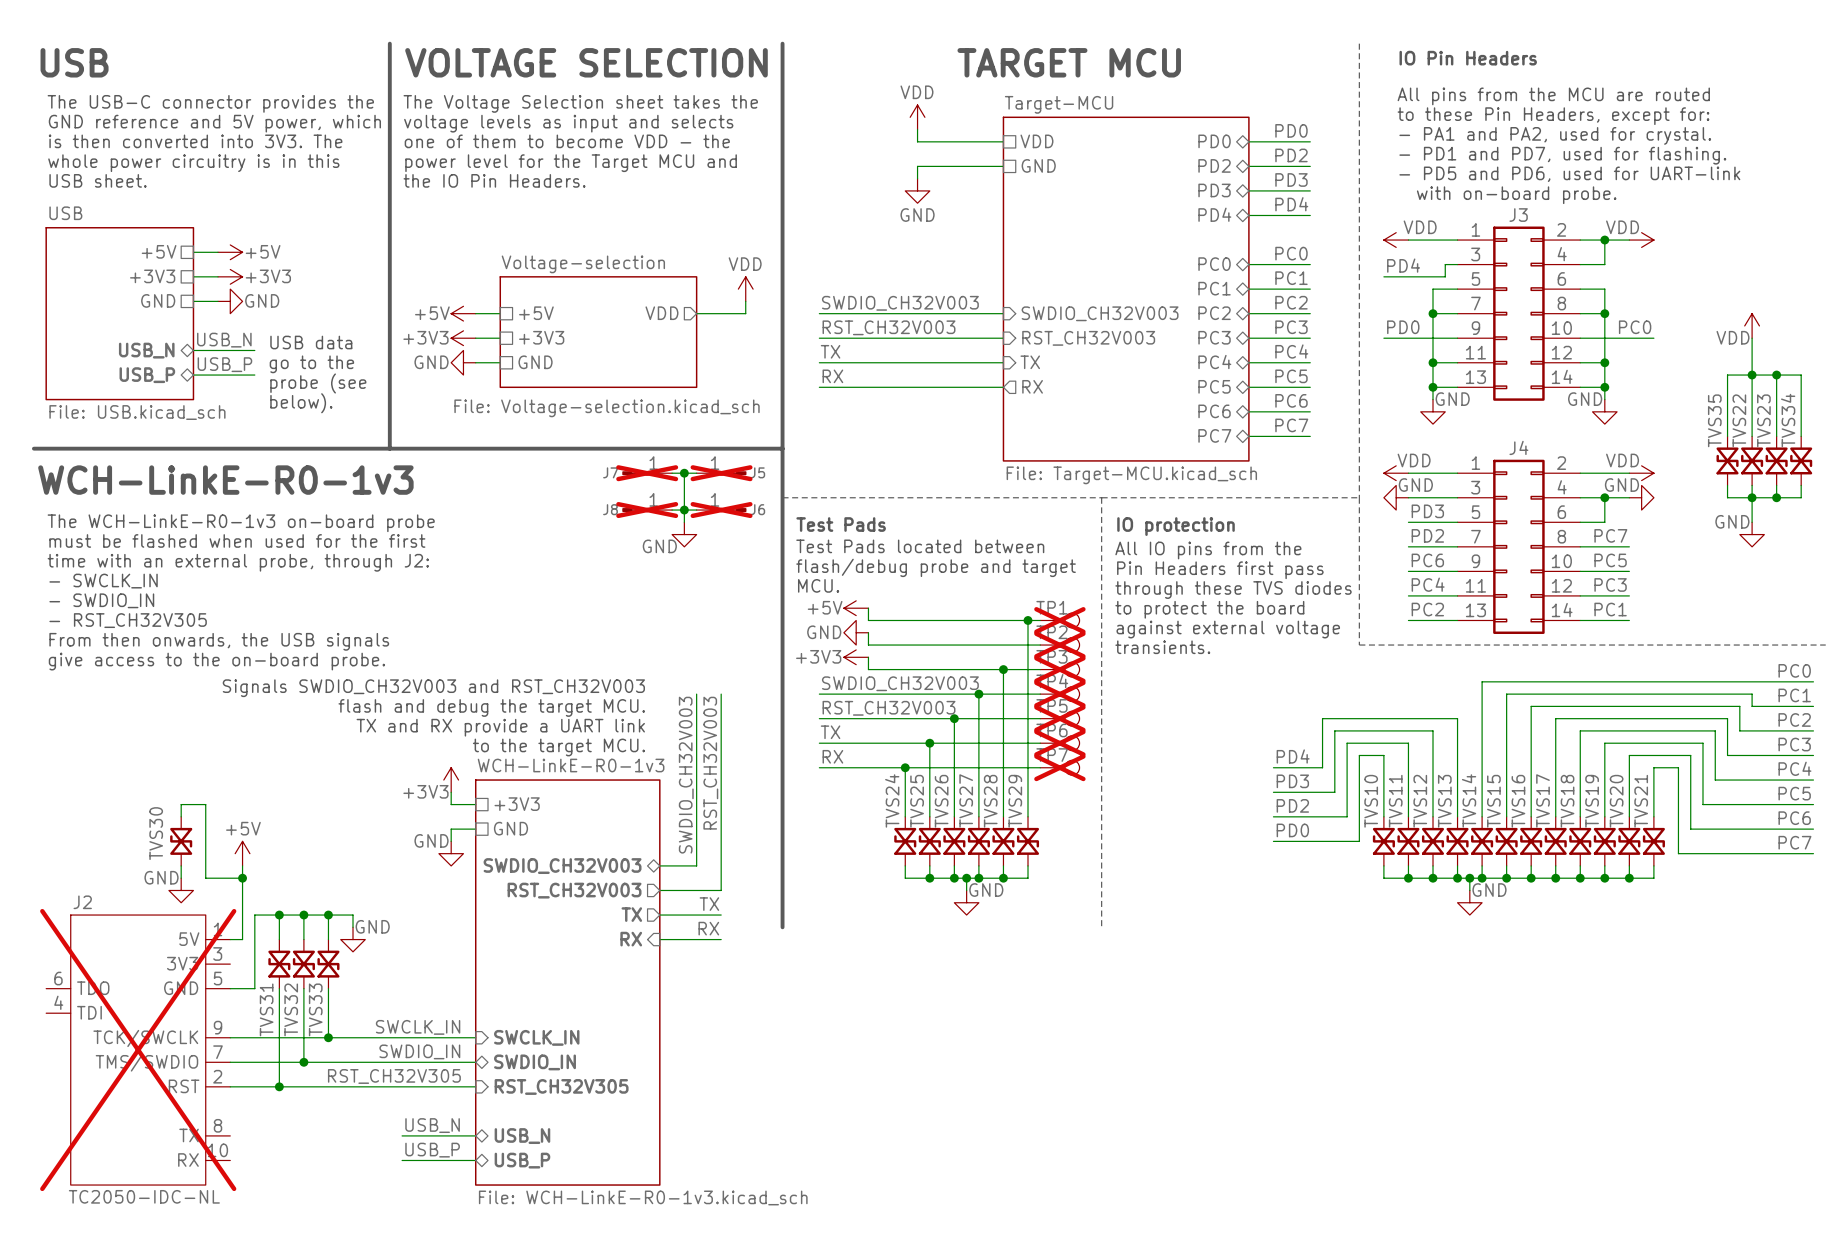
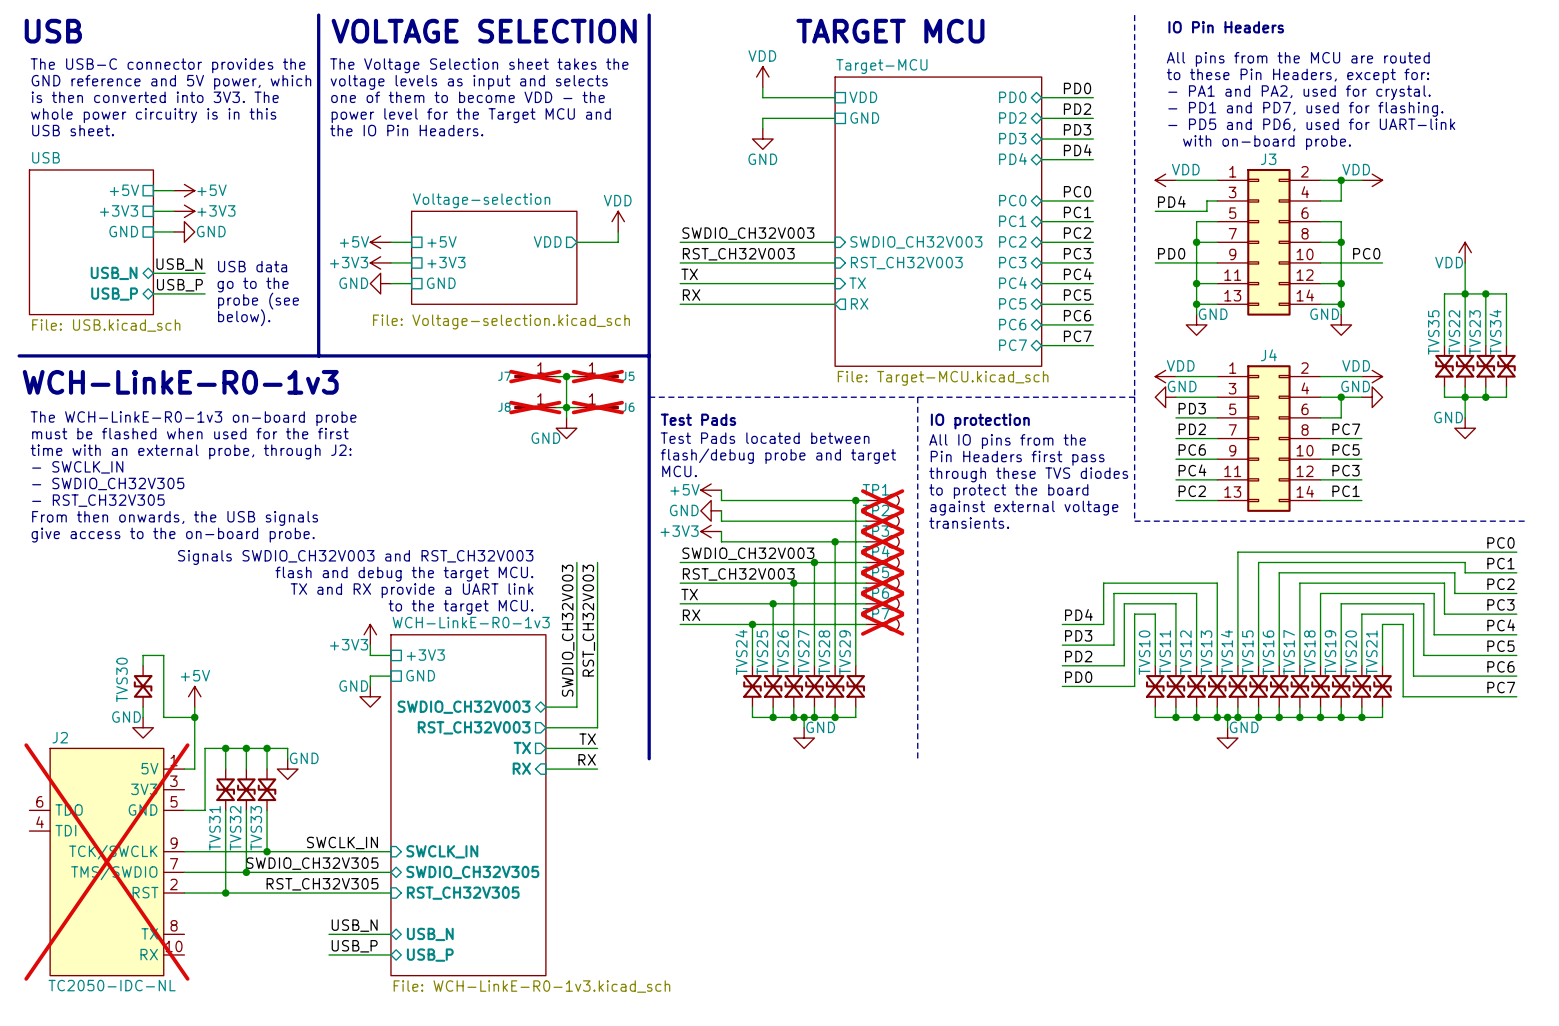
text: - SWDIO_IN (101, 600) -> - SWDIO_CH32V305 (108, 483)
label: SWDIO_IN (419, 1051) -> SWDIO_CH32V305 (312, 863)
sheet pin: SWDIO_IN (535, 1062) -> SWDIO_CH32V305 (472, 872)

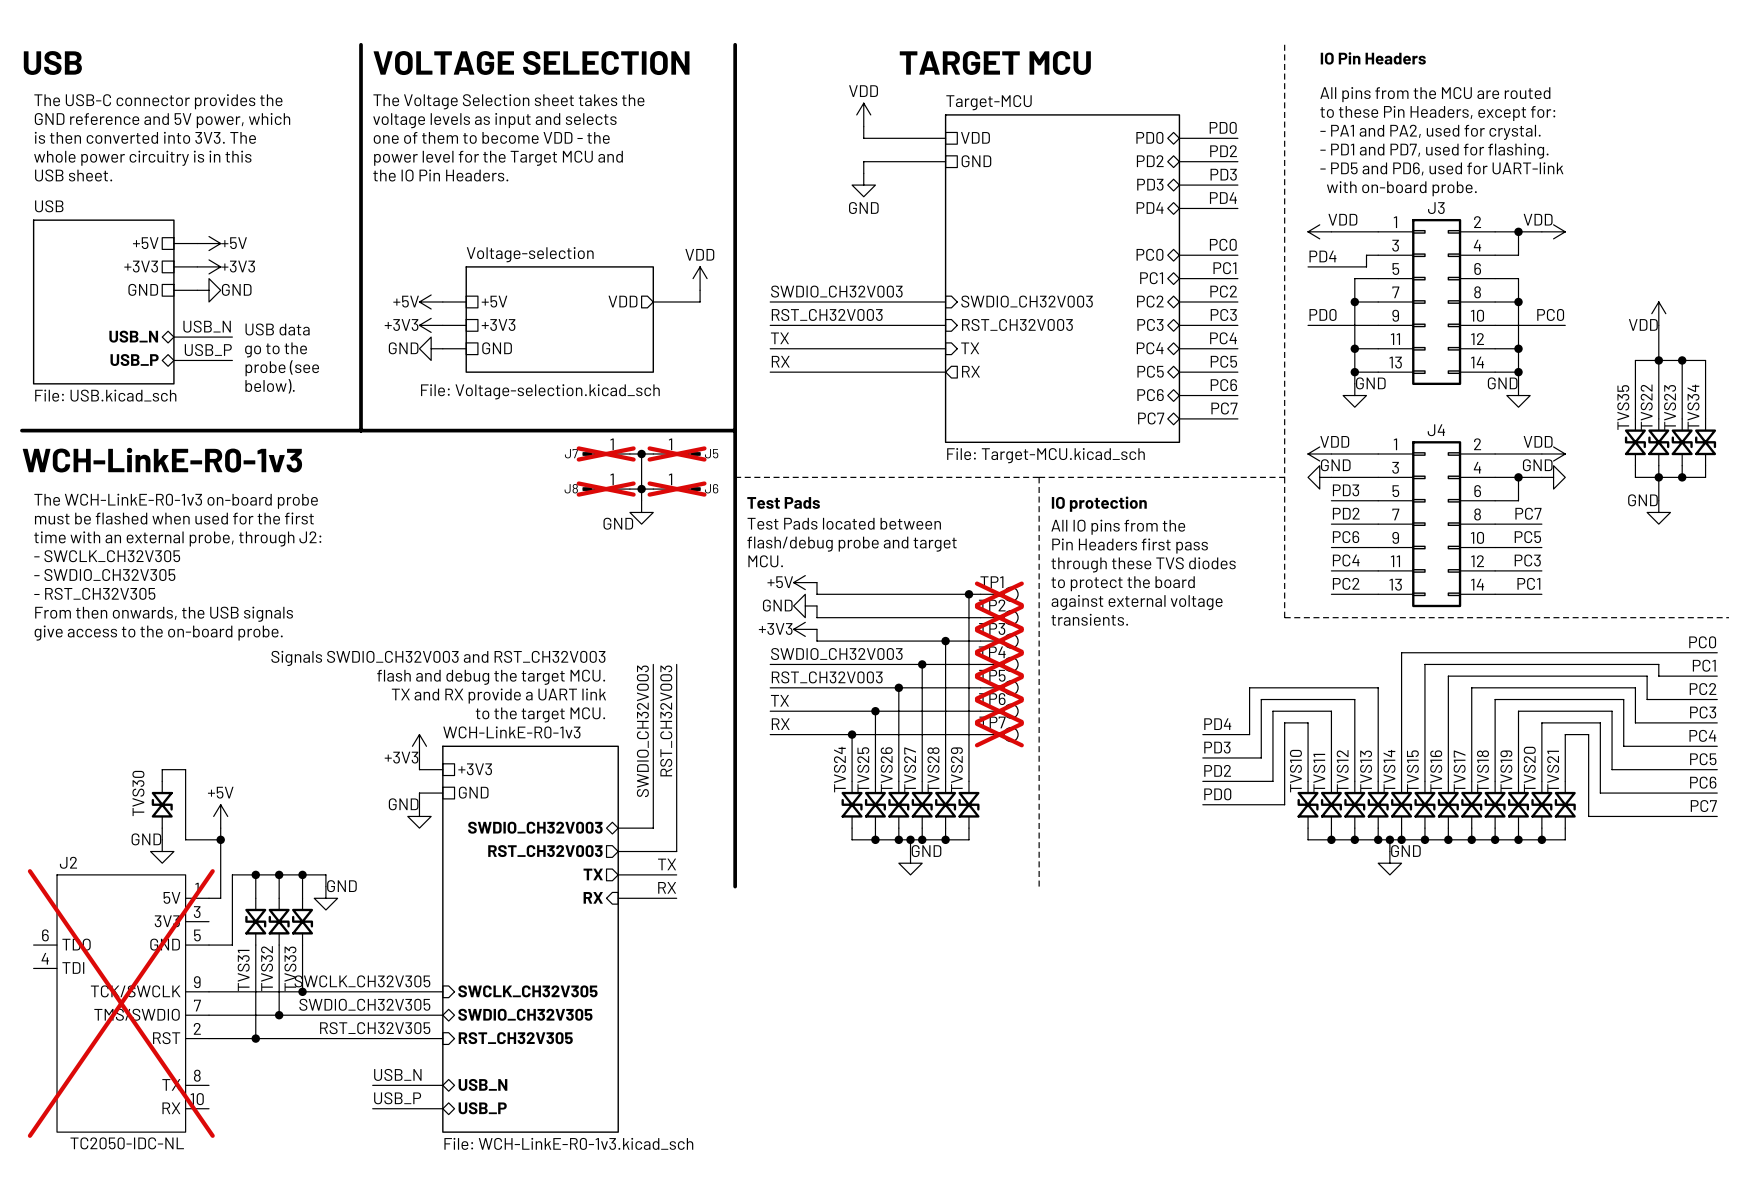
text: - SWCLK_IN (77, 467) -> - SWCLK_CH32V305 (107, 556)
label: SWCLK_IN (342, 842) -> SWCLK_CH32V305 (362, 981)
sheet pin: SWCLK_IN (442, 851) -> SWCLK_CH32V305 (527, 991)

